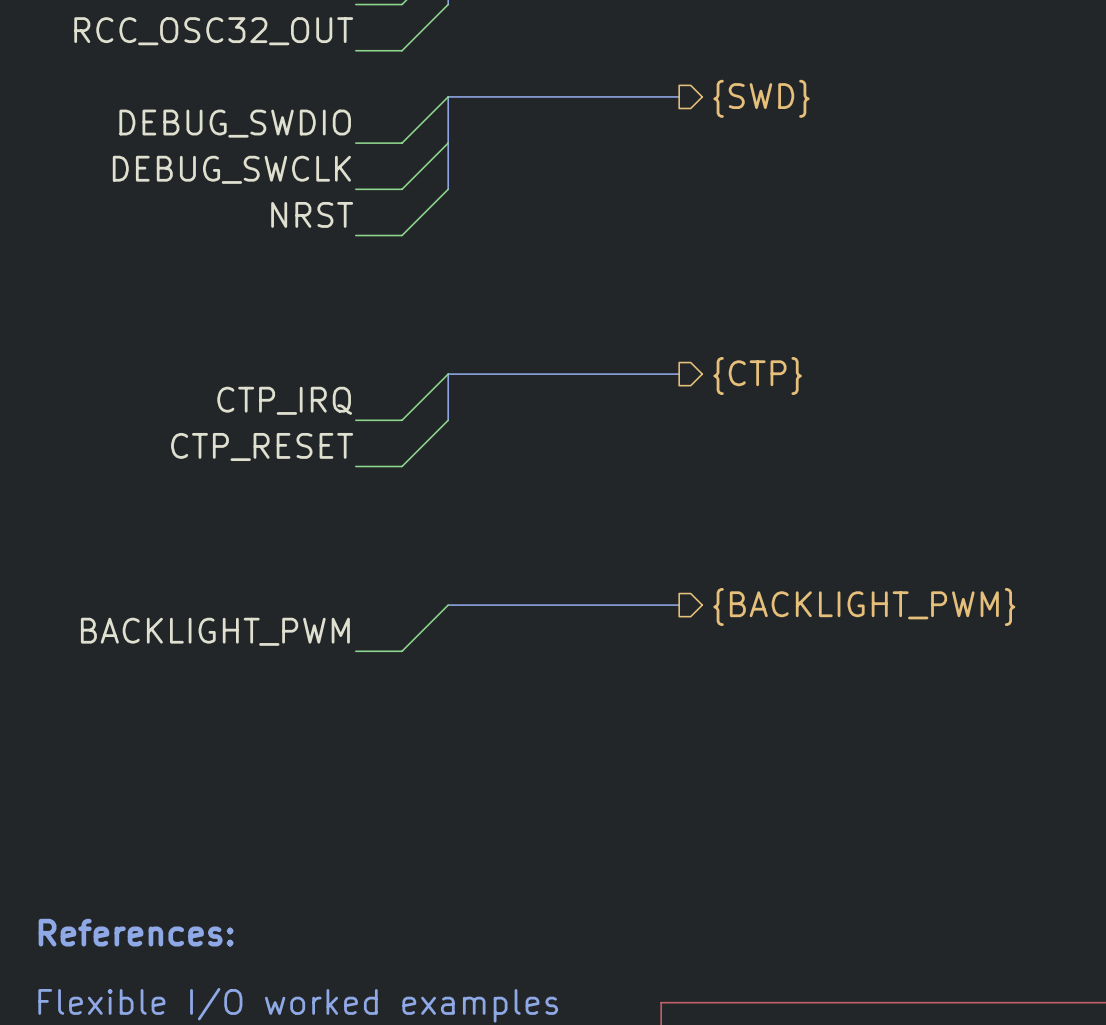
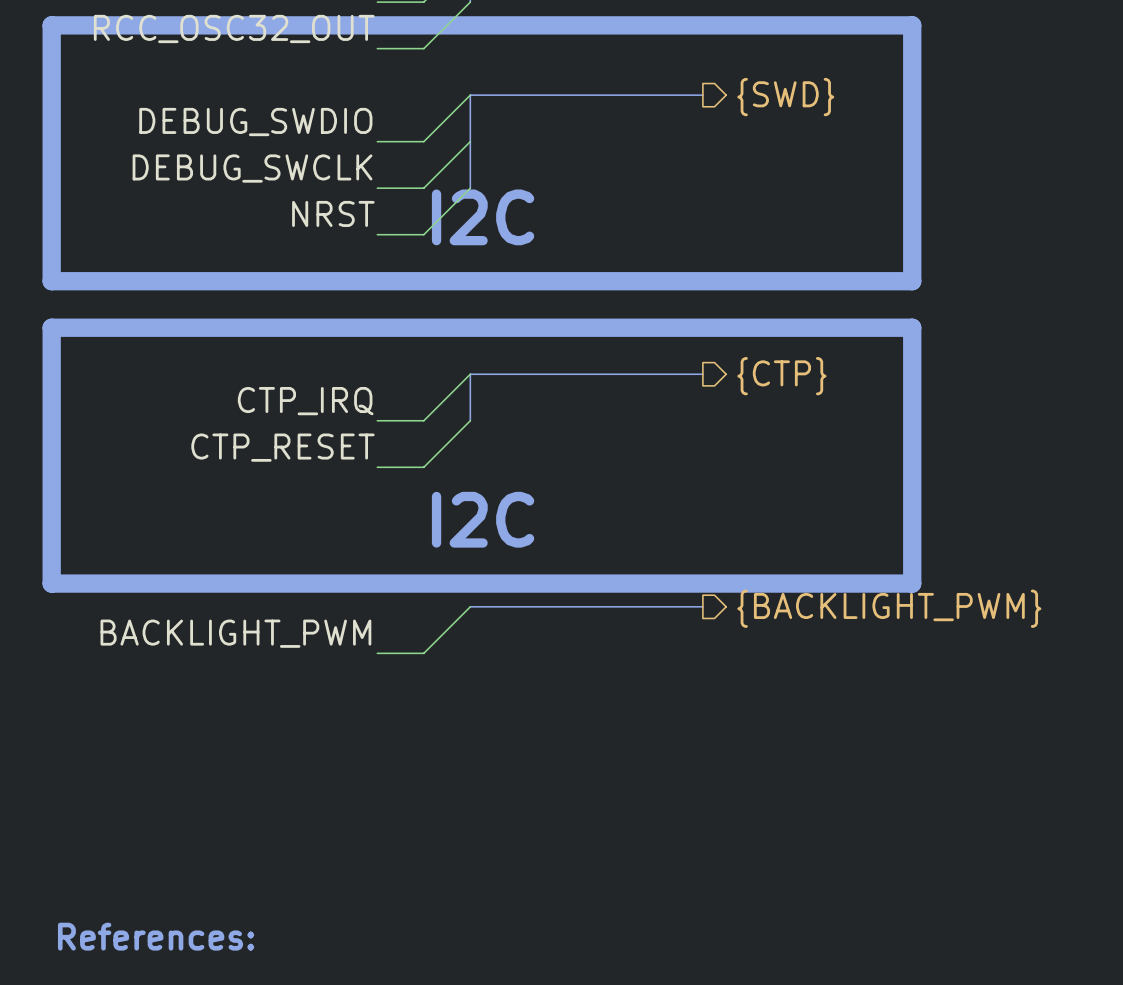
line: none -> (51, 25) (51, 281) (912, 281) (912, 25) (51, 25)
text: none -> I2C (483, 217)
line: none -> (51, 327) (51, 583) (912, 583) (912, 327) (51, 327)
text: none -> I2C (483, 519)

